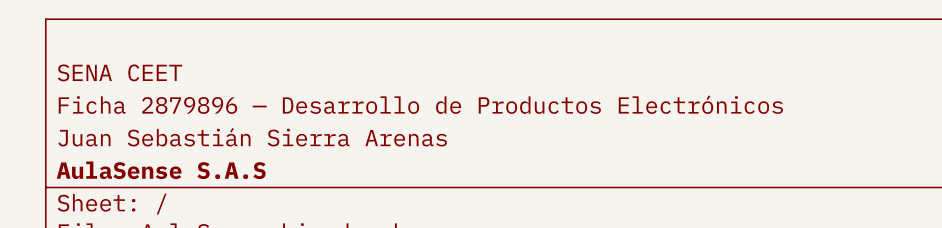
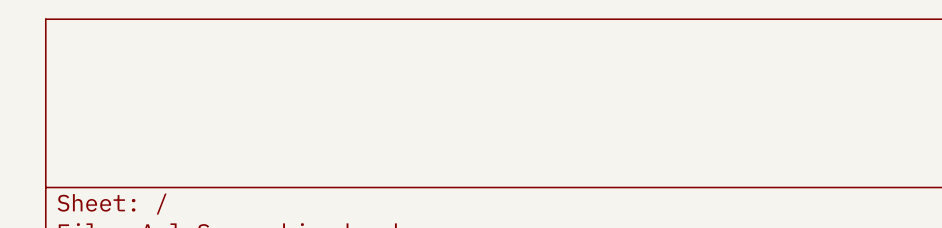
title block: SENA CEET (119, 72) -> none
title block: Ficha 2879896 — Desarrollo de Productos Electrónicos (420, 104) -> none
title block: Juan Sebastián Sierra Arenas (252, 137) -> none
title block: AulaSense S.A.S (161, 170) -> none

